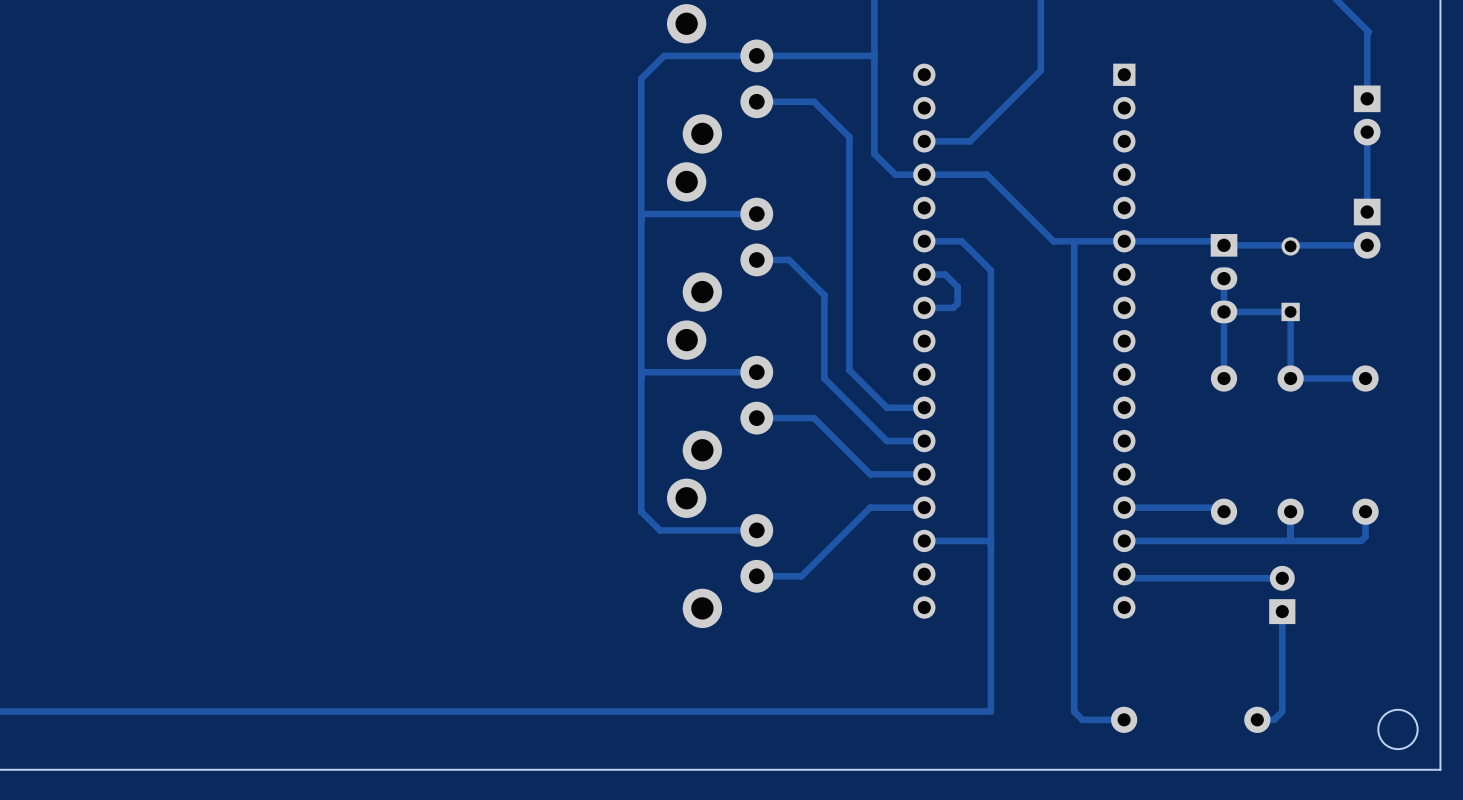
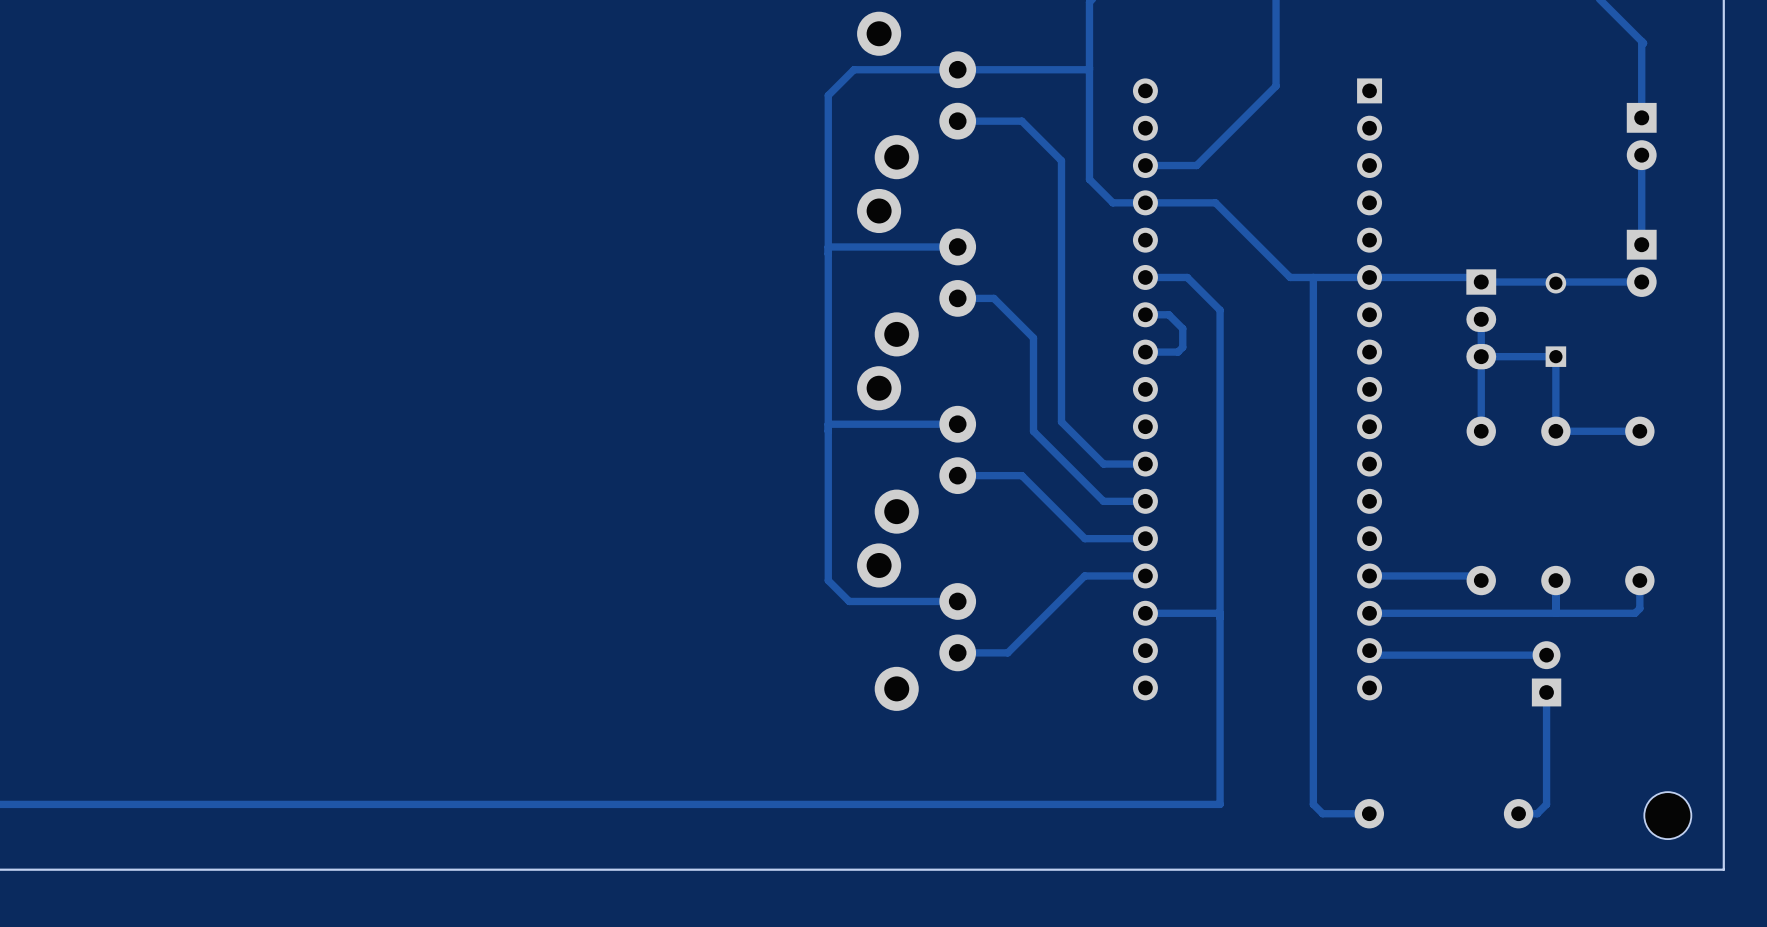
round board edge: [1377, 708, 1419, 751] -> none
part: none -> (1667, 815)

